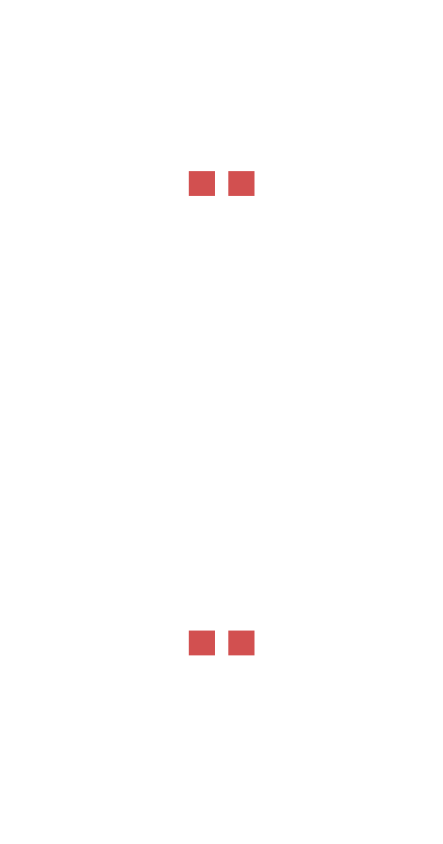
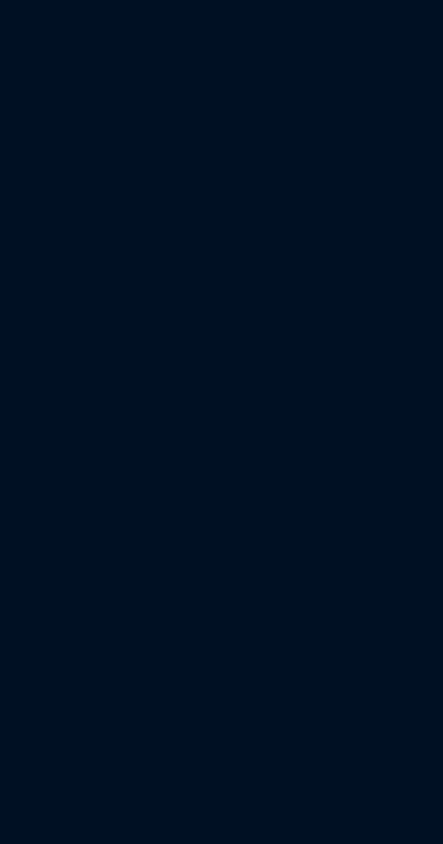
part: (221, 183) -> none
part: (221, 642) -> none

